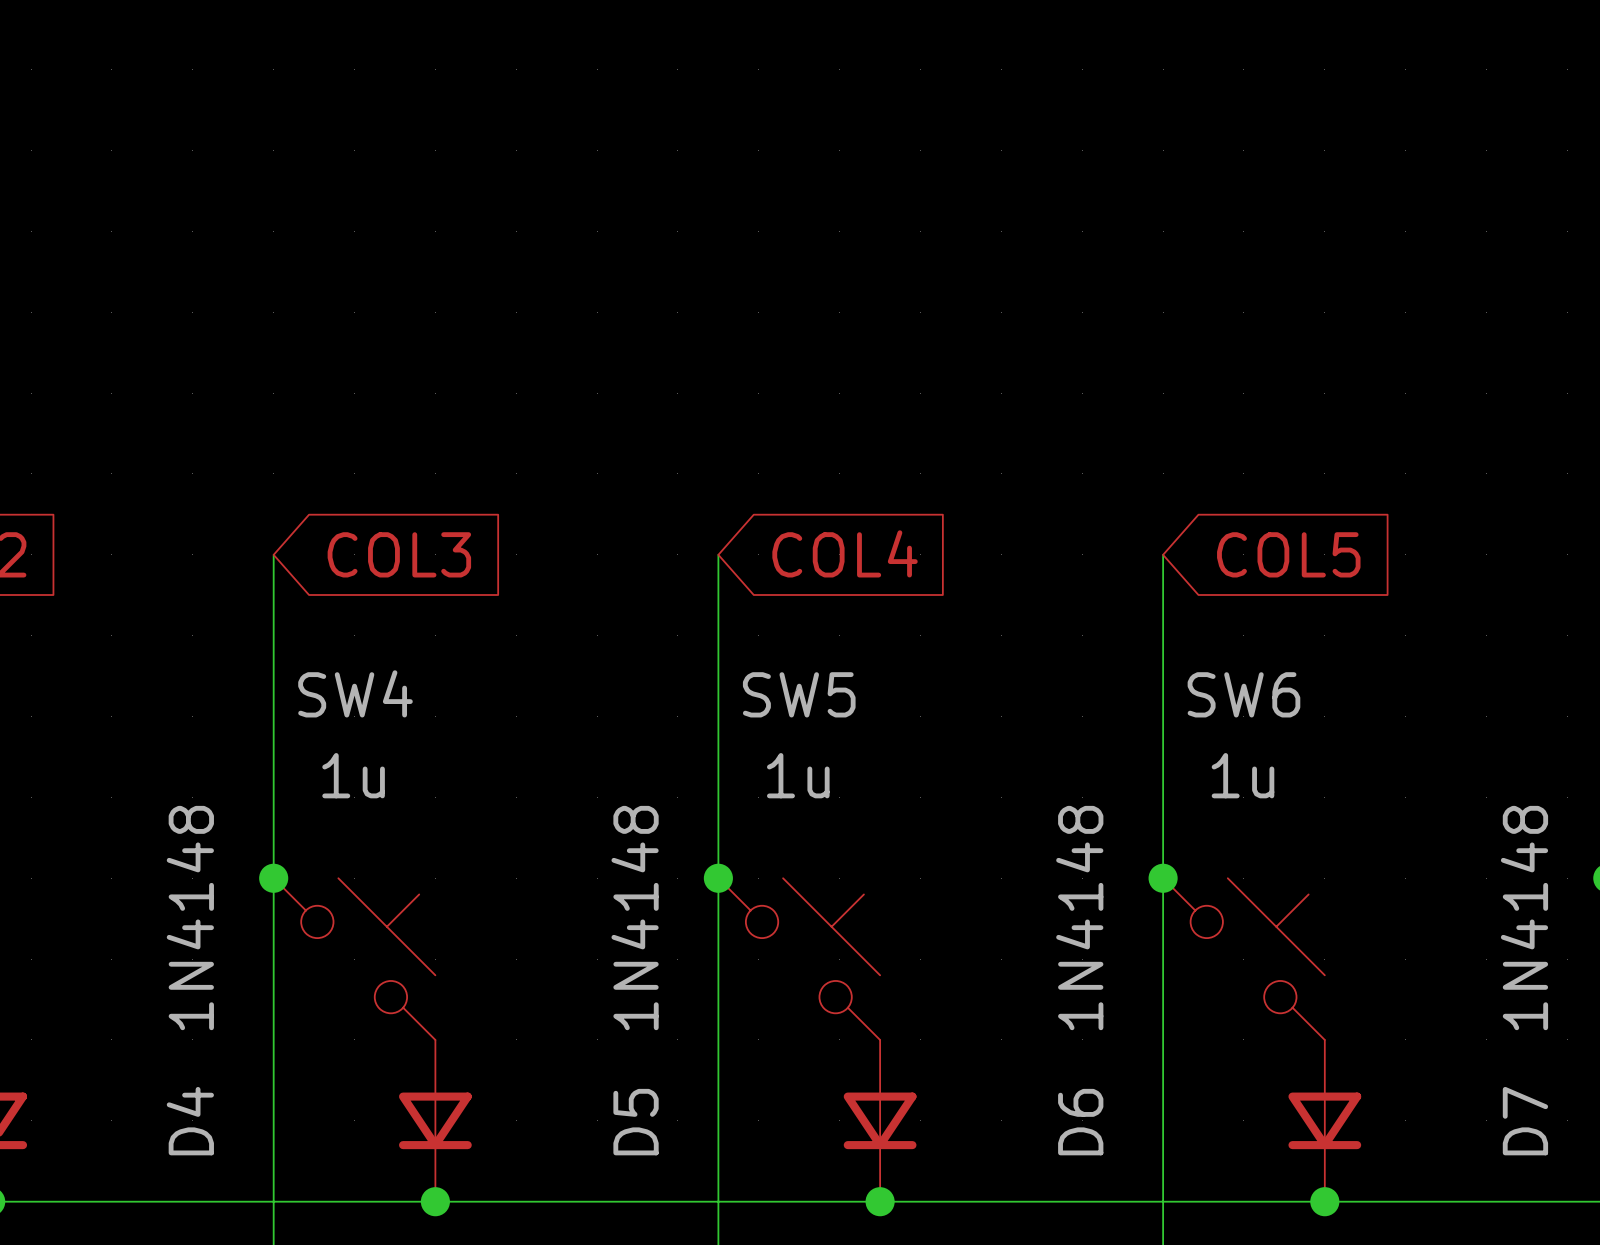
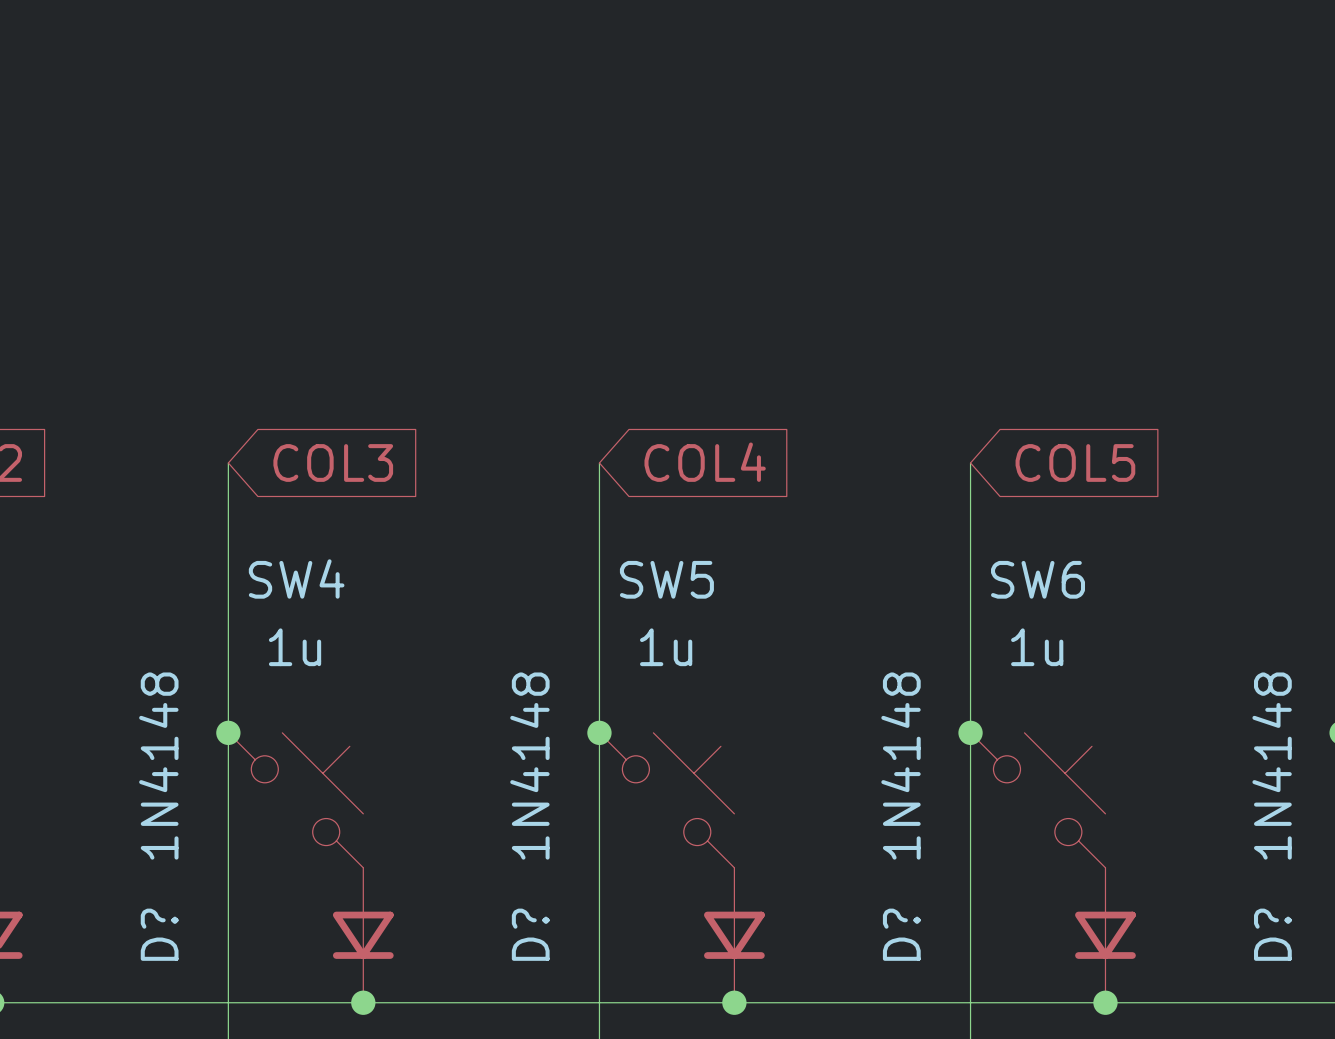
D4 name: D4 (190, 1121) -> D? (159, 934)
D7 name: D7 (1525, 1121) -> D? (1272, 934)
D5 name: D5 (636, 1122) -> D? (530, 934)
D6 name: D6 (1080, 1122) -> D? (901, 934)

